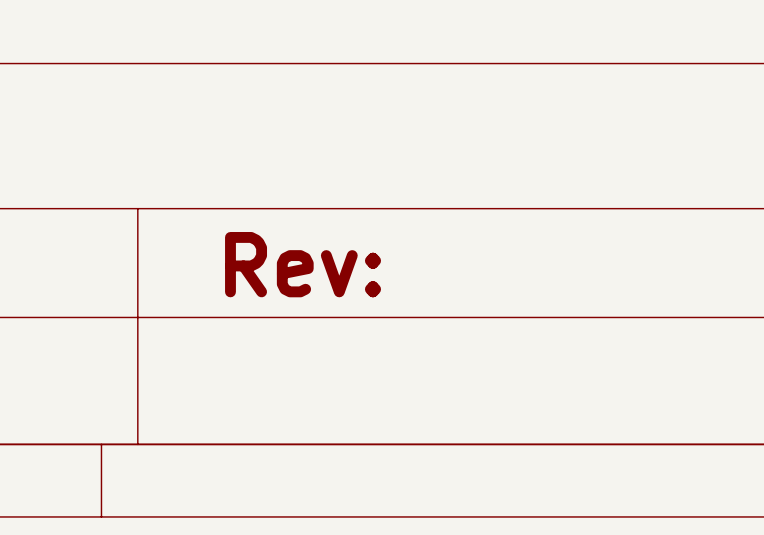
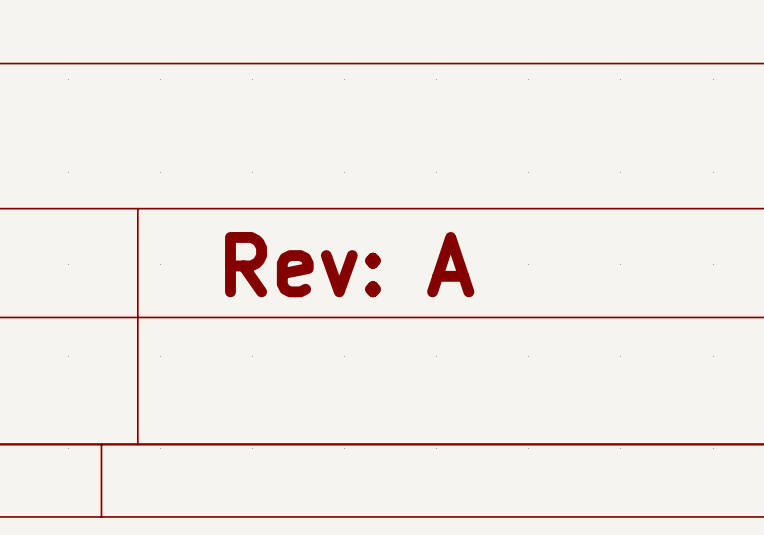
title block: Rev: (303, 264) -> Rev: A (349, 264)

